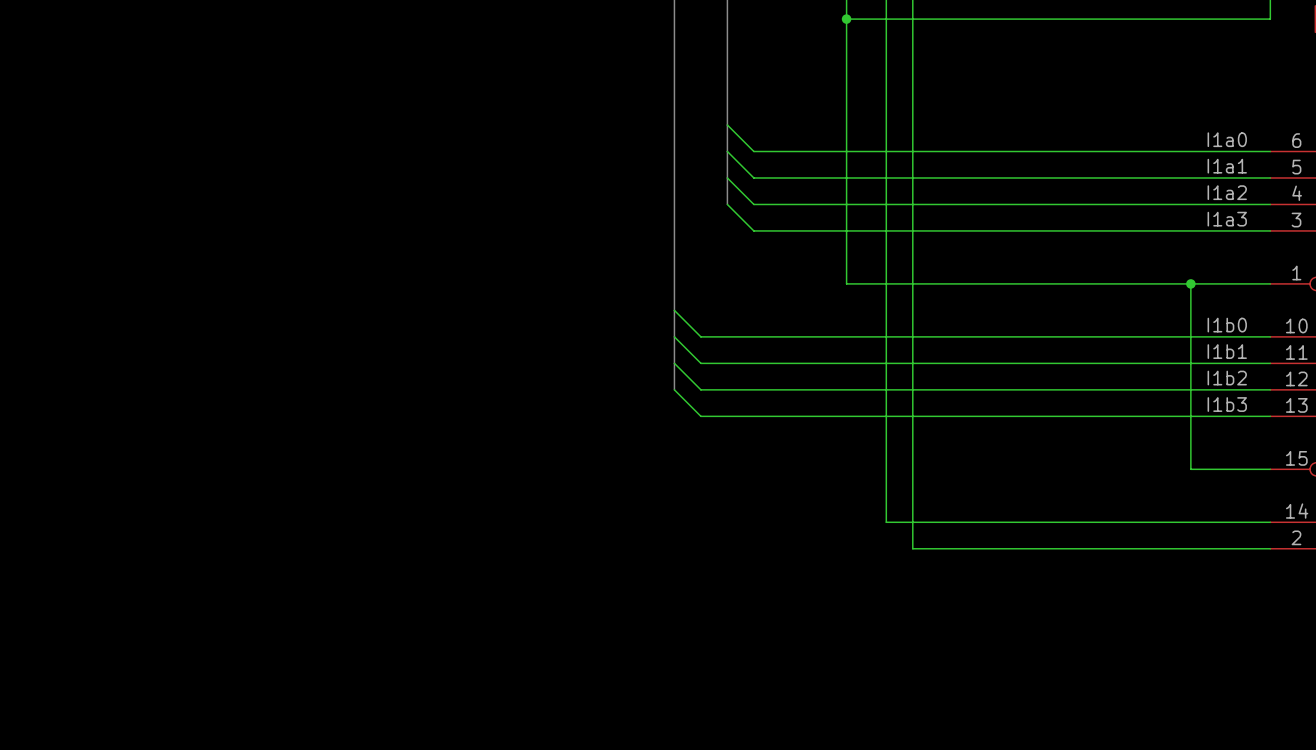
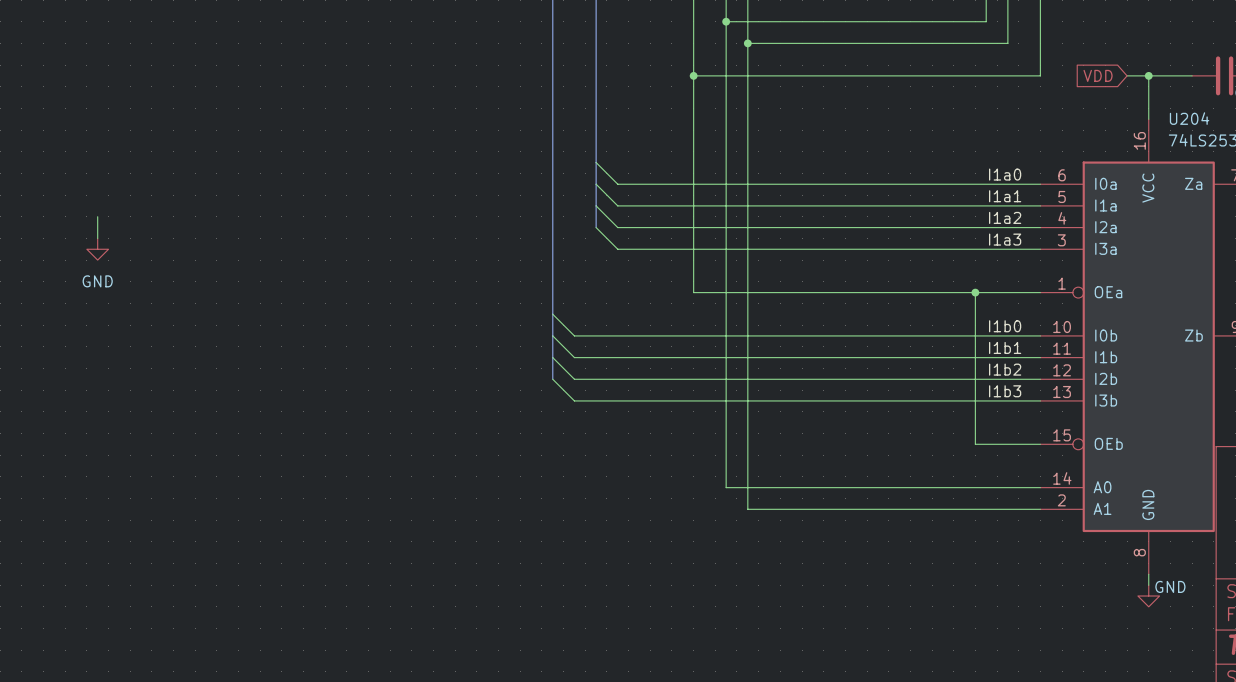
wire: none -> (97, 216) (97, 238)
power symbol: none -> GND (97, 249)

